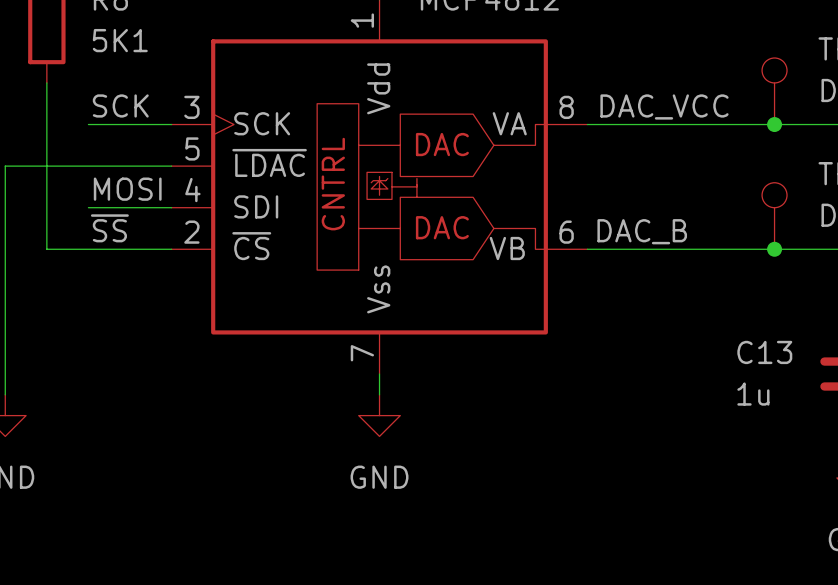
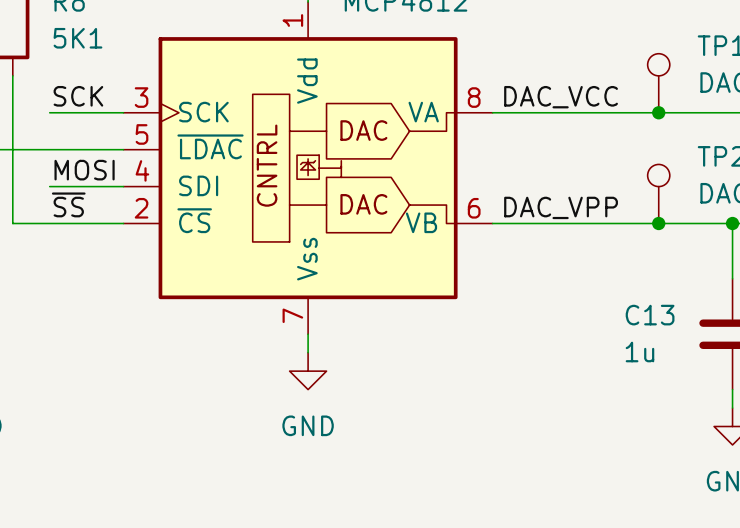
label: DAC_B (642, 231) -> DAC_VPP (561, 207)

